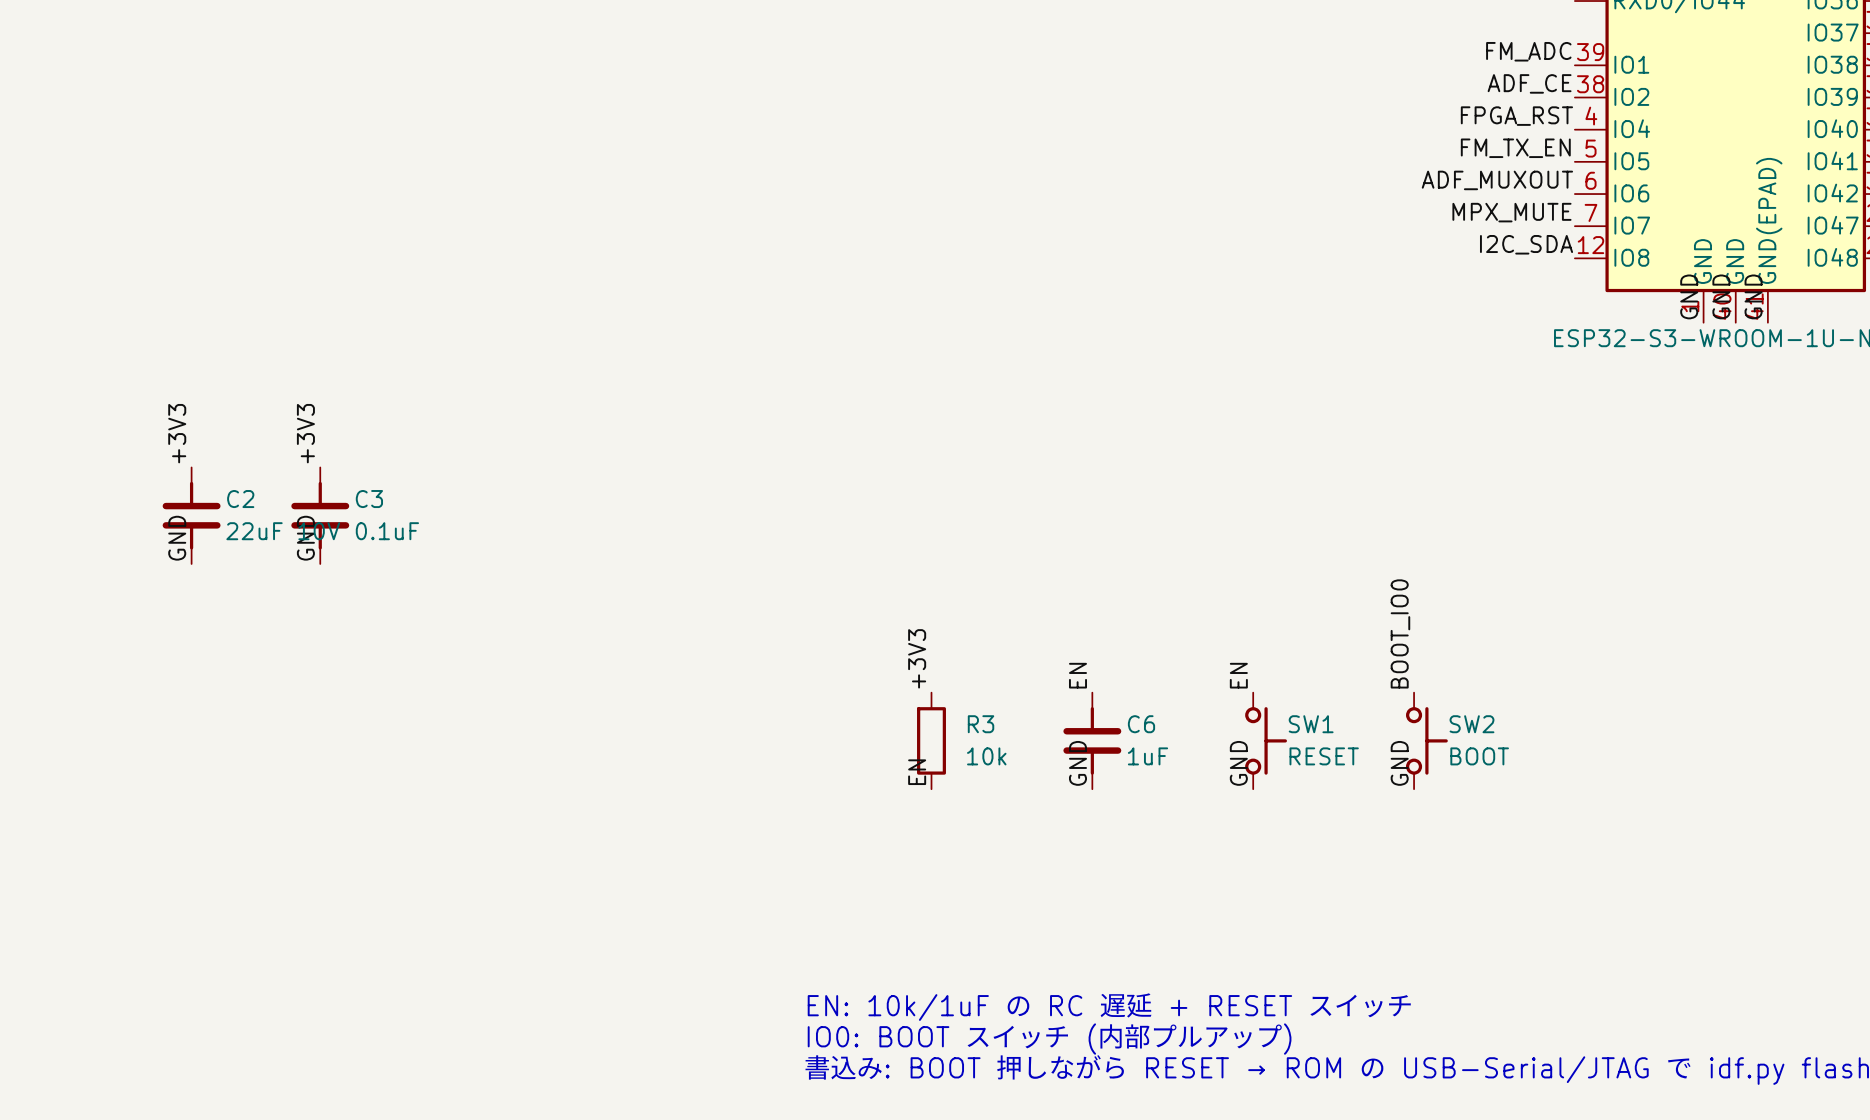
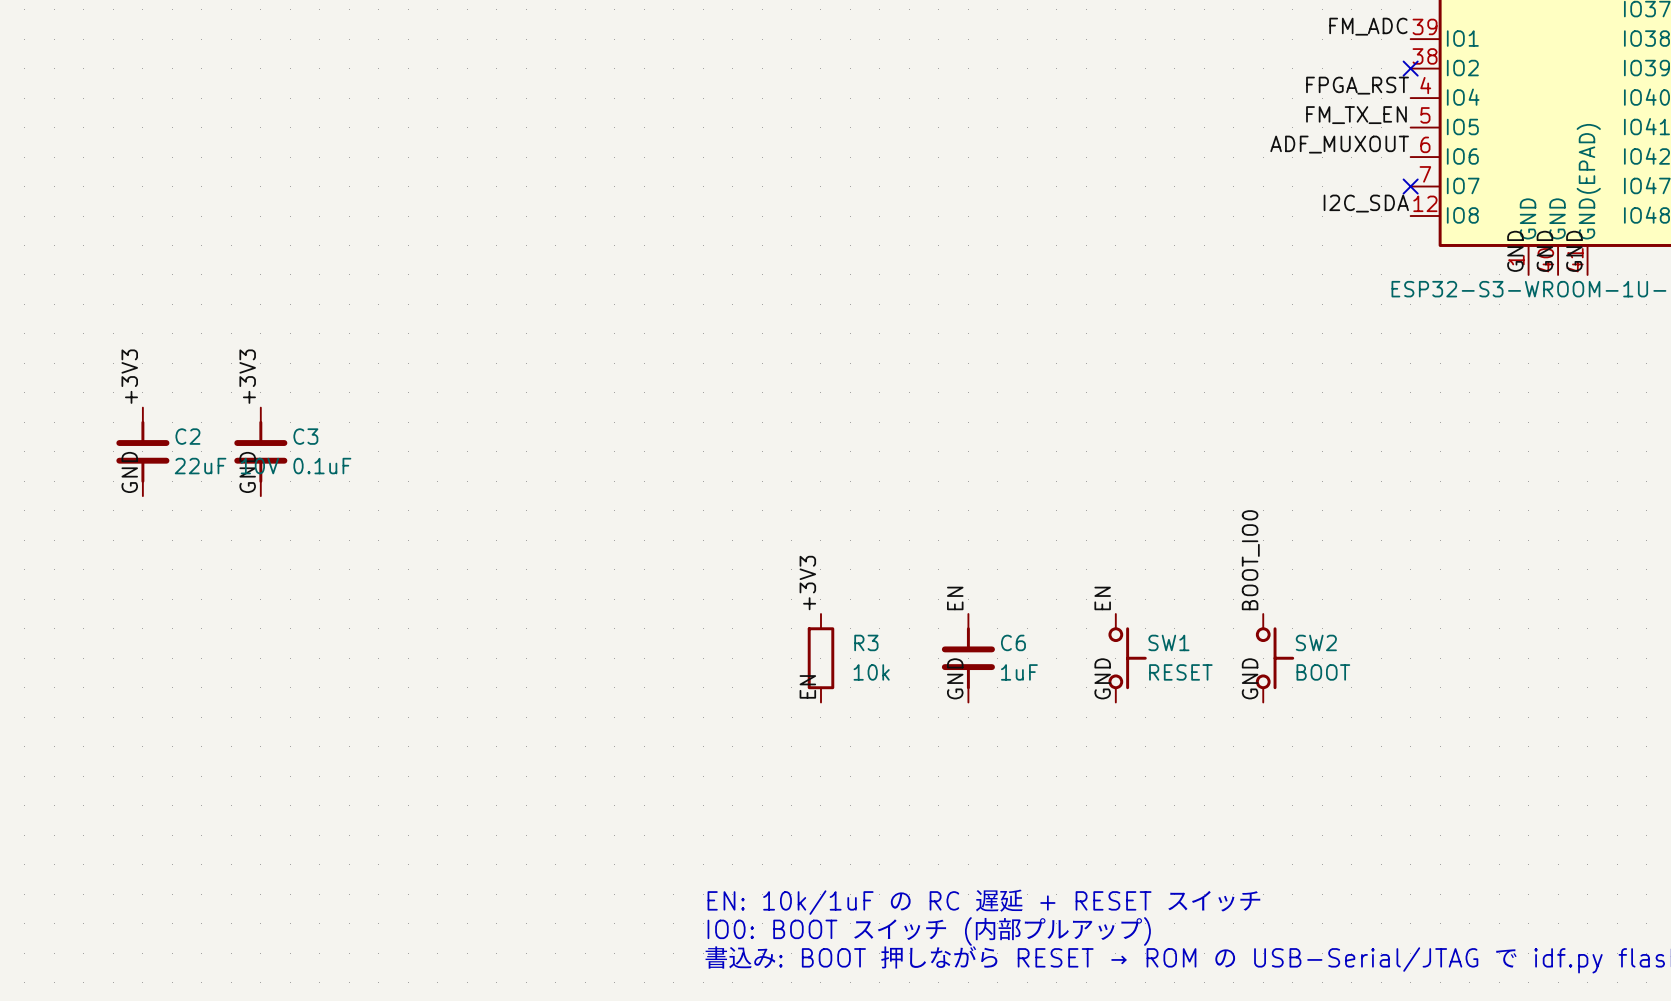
label: ADF_CE (1529, 83) -> none
no-connect mark: none -> (1410, 68)
label: MPX_MUTE (1511, 212) -> none
no-connect mark: none -> (1410, 186)

